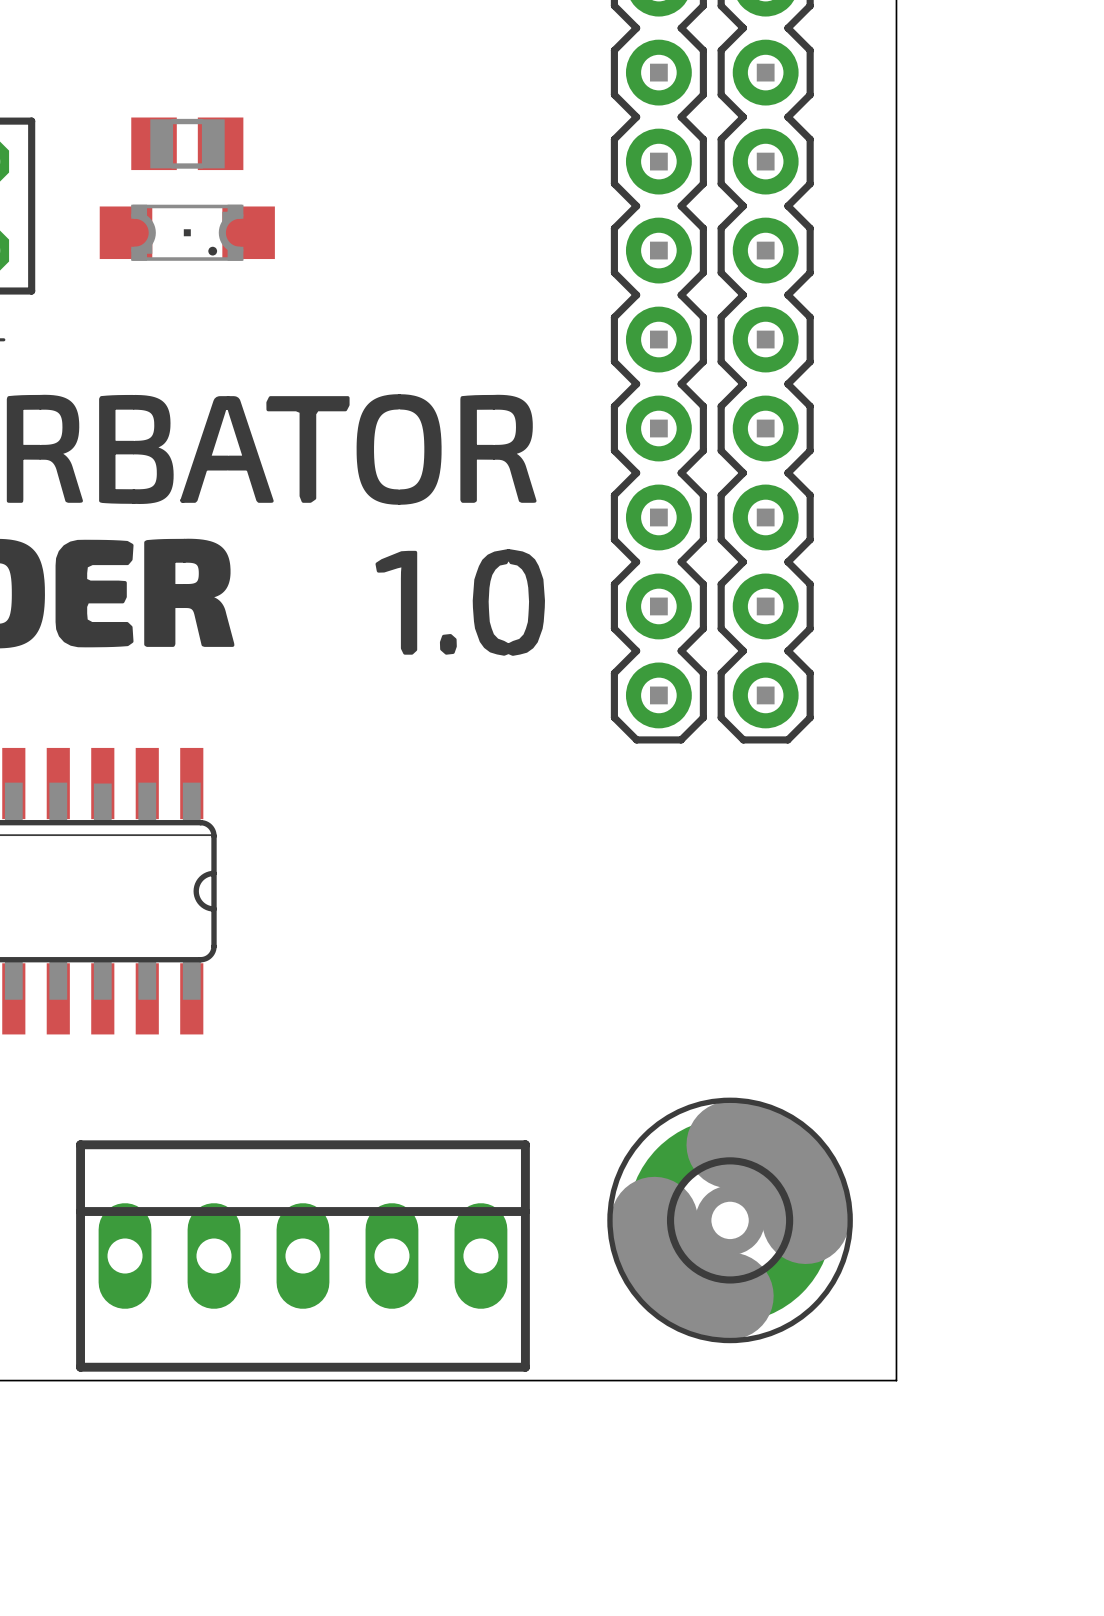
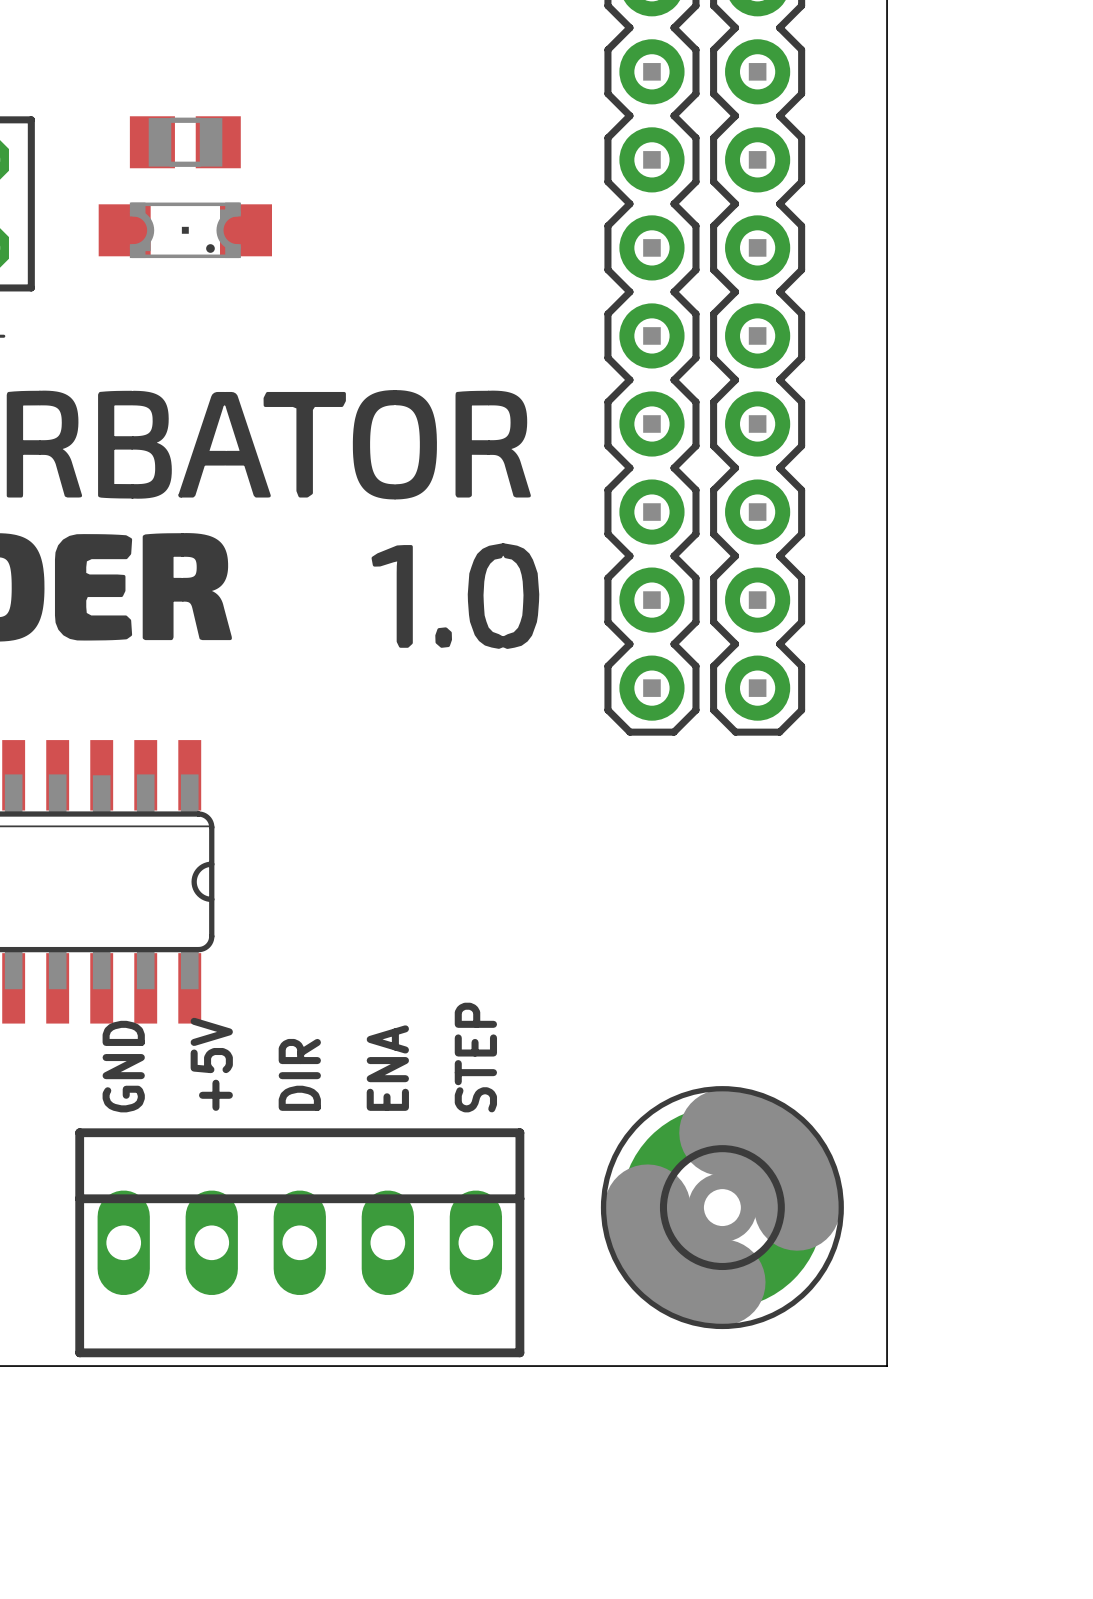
text: none -> STEP (475, 1057)
text: none -> +5V (211, 1064)
text: none -> GND (123, 1066)
text: none -> ENA (387, 1068)
text: none -> DIR (299, 1074)

